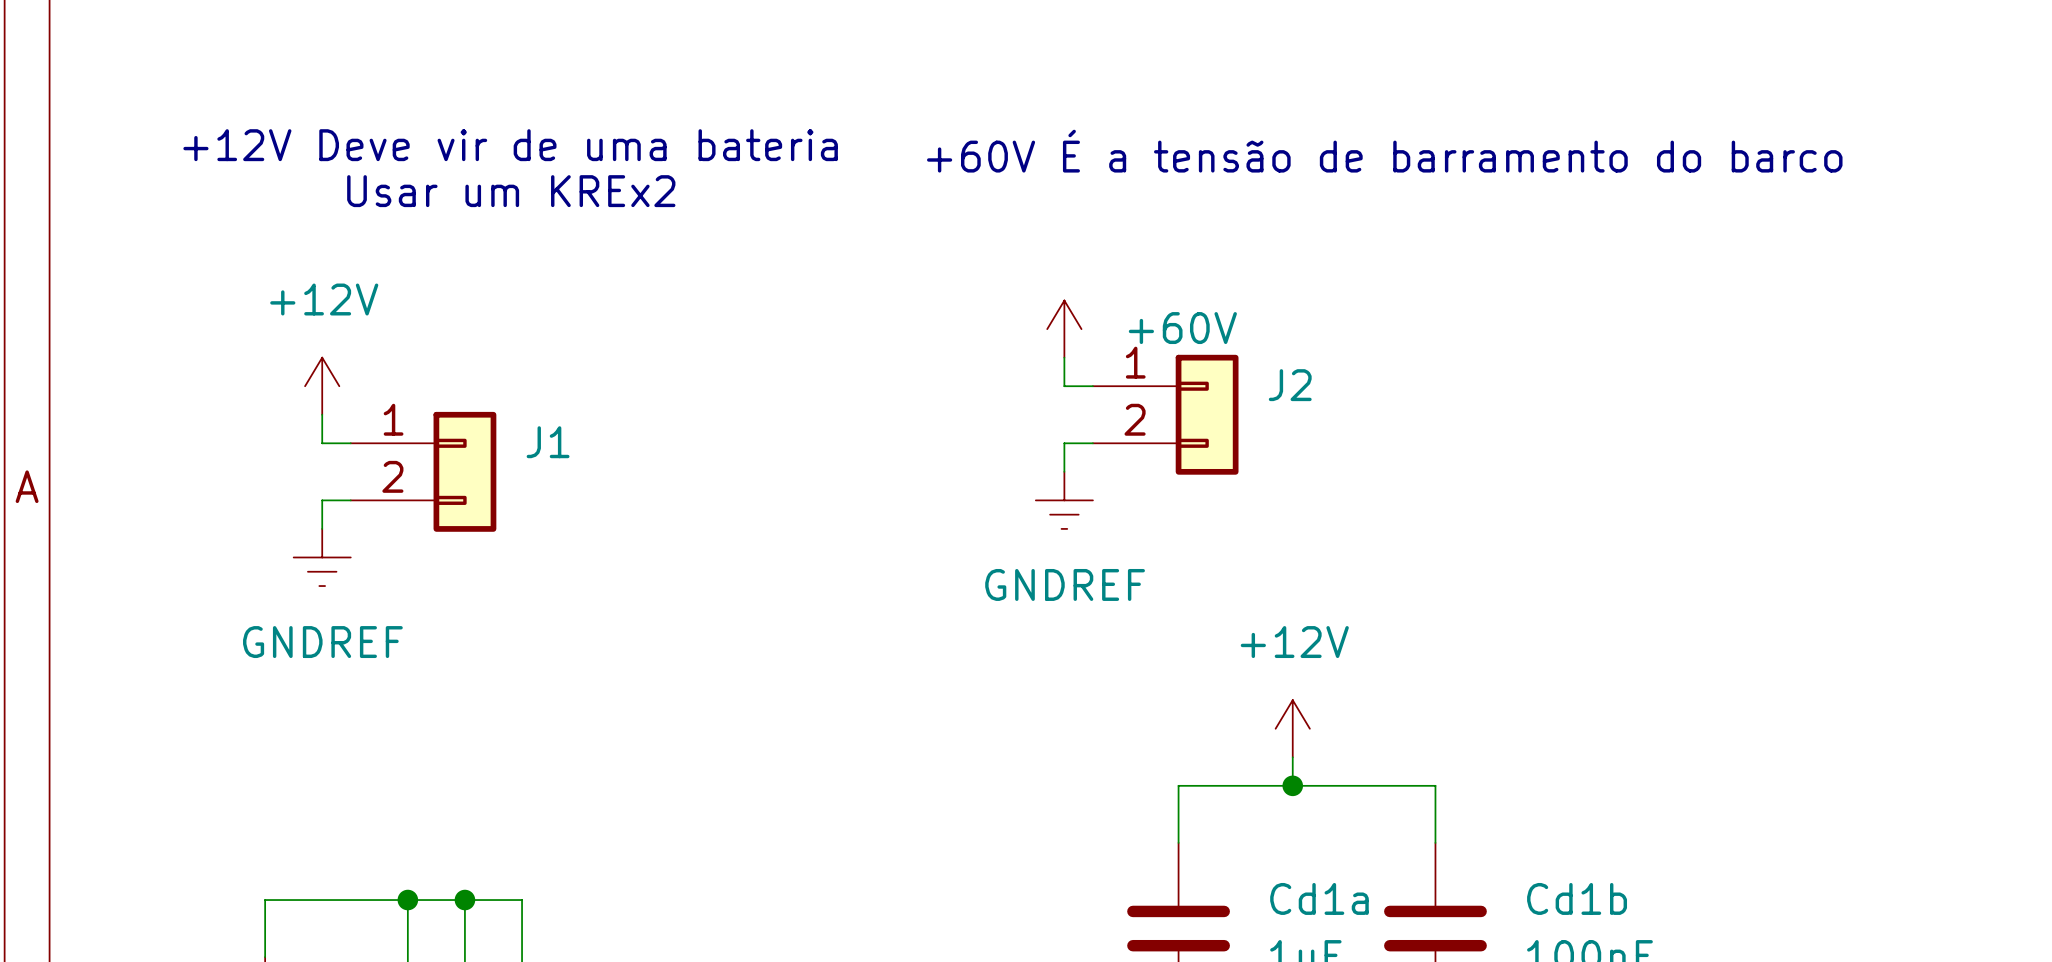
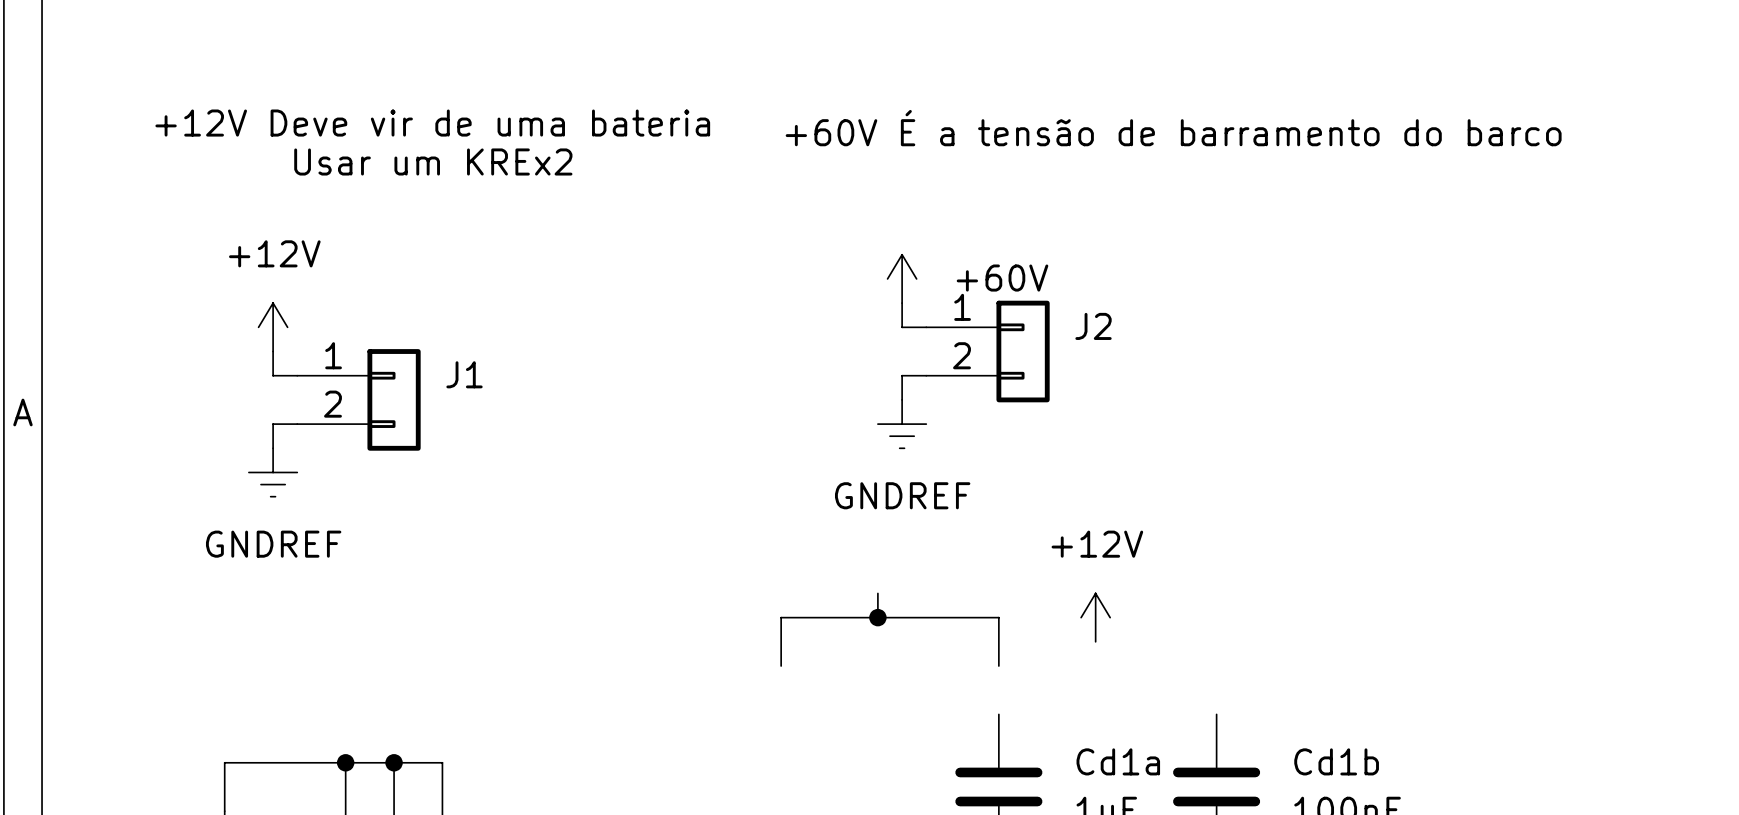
junction: none -> (877, 617)
wire: (1292, 757) (1292, 785) -> (877, 593) (877, 617)
junction: (1292, 785) -> none
wire: (1178, 842) (1178, 785) (1435, 785) (1435, 842) -> (781, 666) (781, 617) (998, 617) (998, 666)

